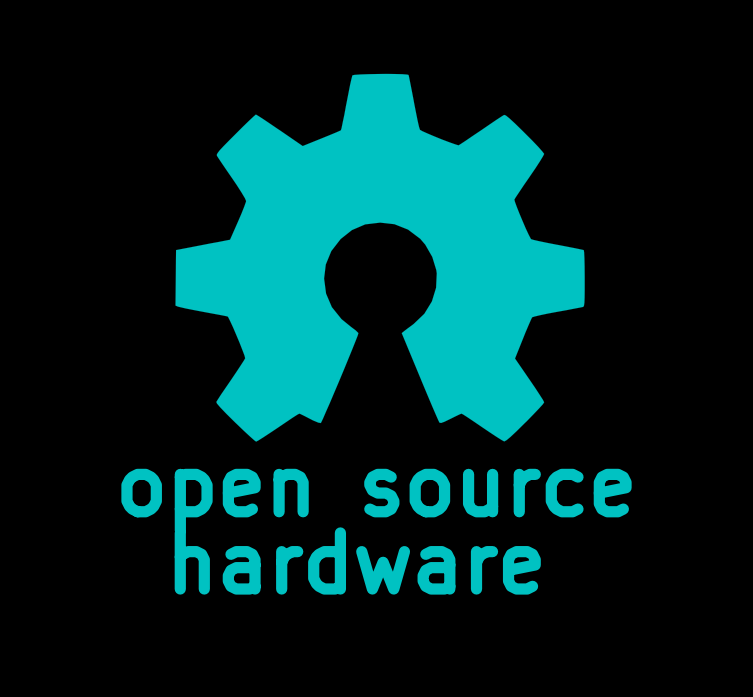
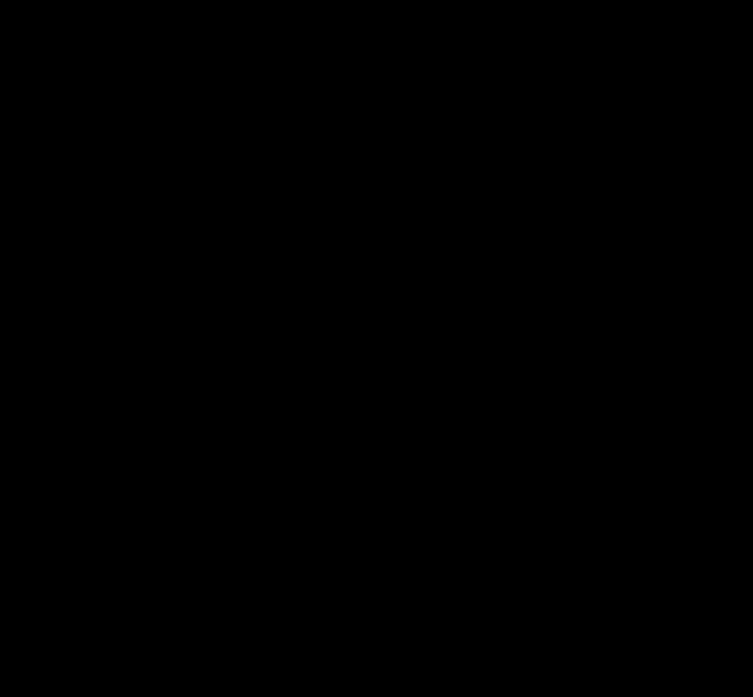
drawing: [175, 73, 585, 442] -> none

